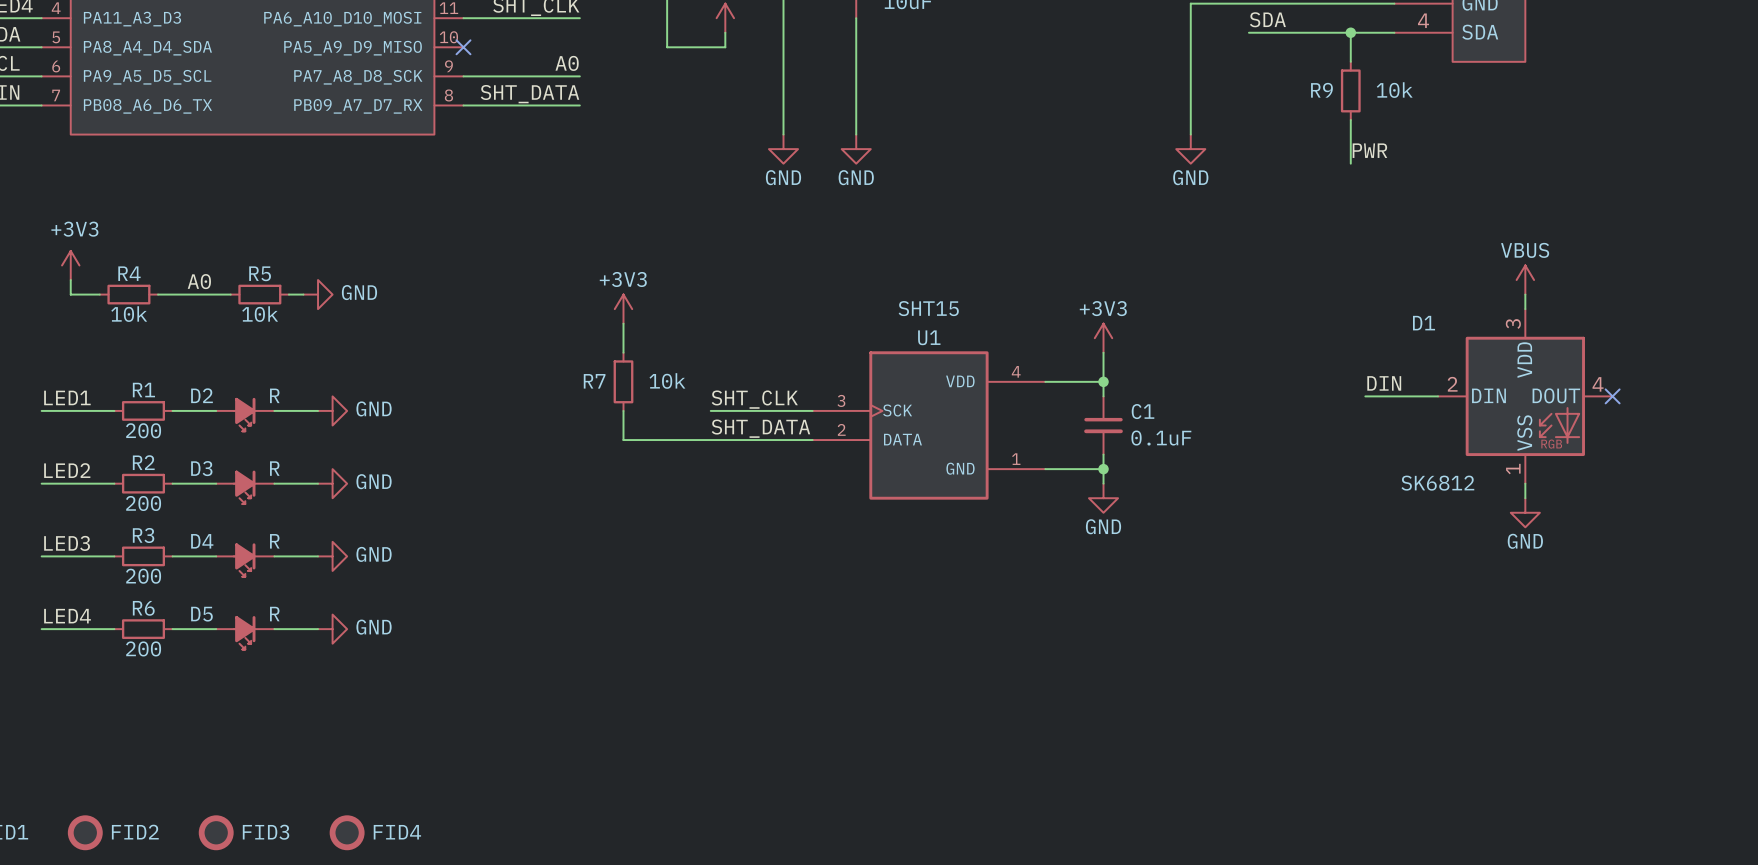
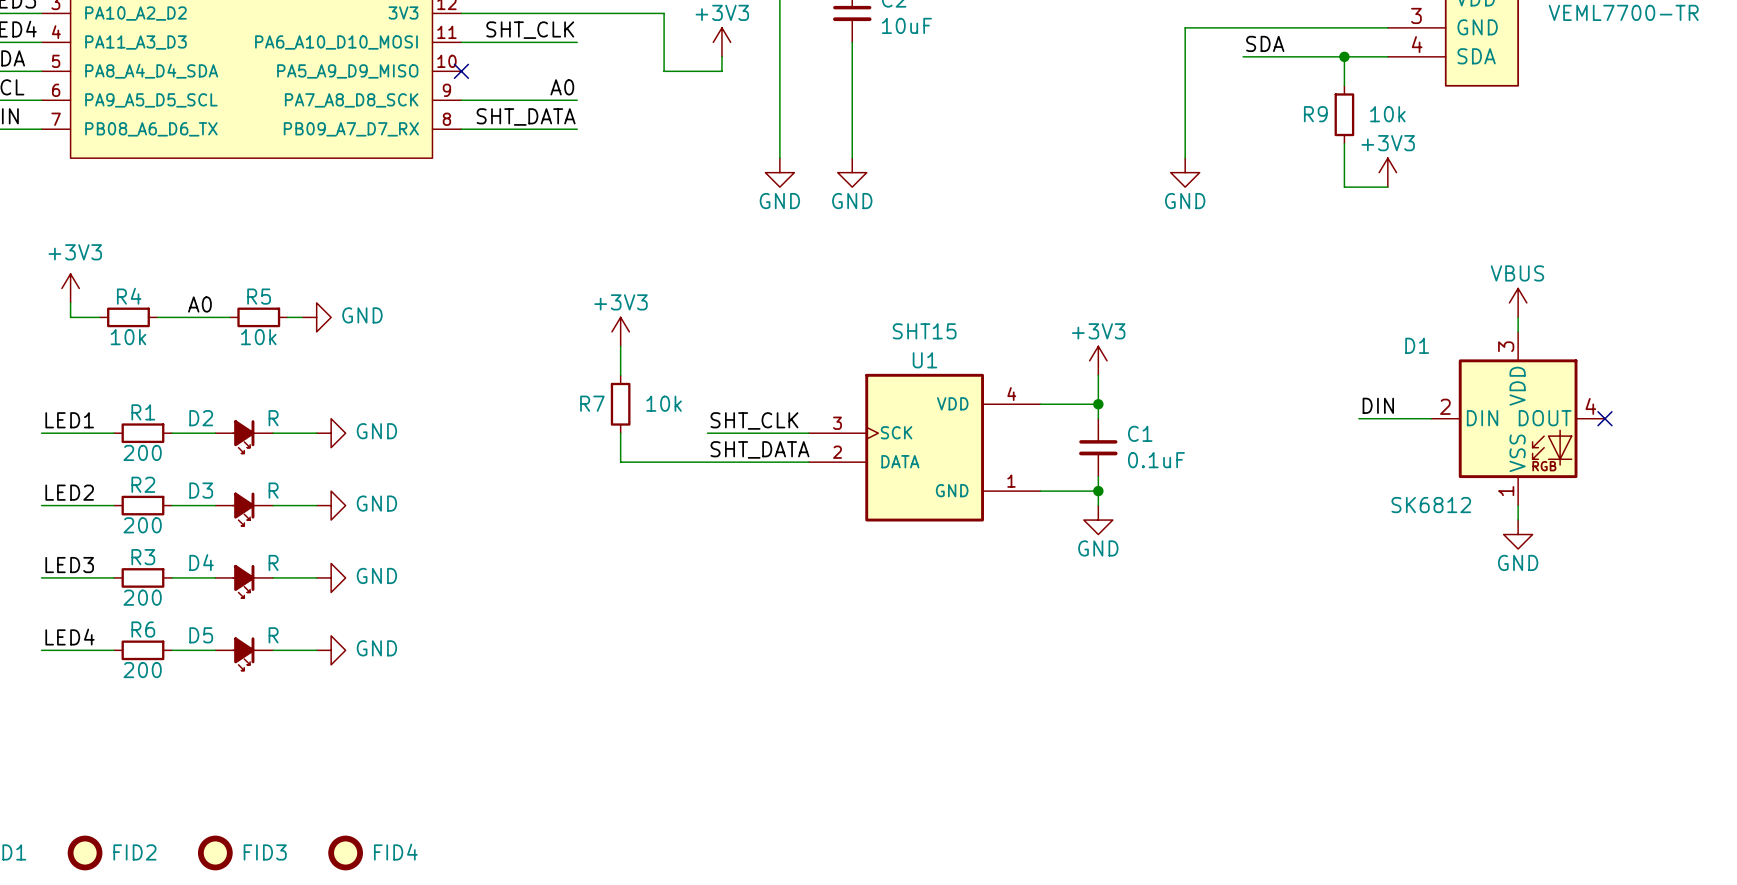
power symbol: none -> +3V3 (1387, 172)
label: PWR (1369, 150) -> none
wire: none -> (1344, 187) (1387, 187)

